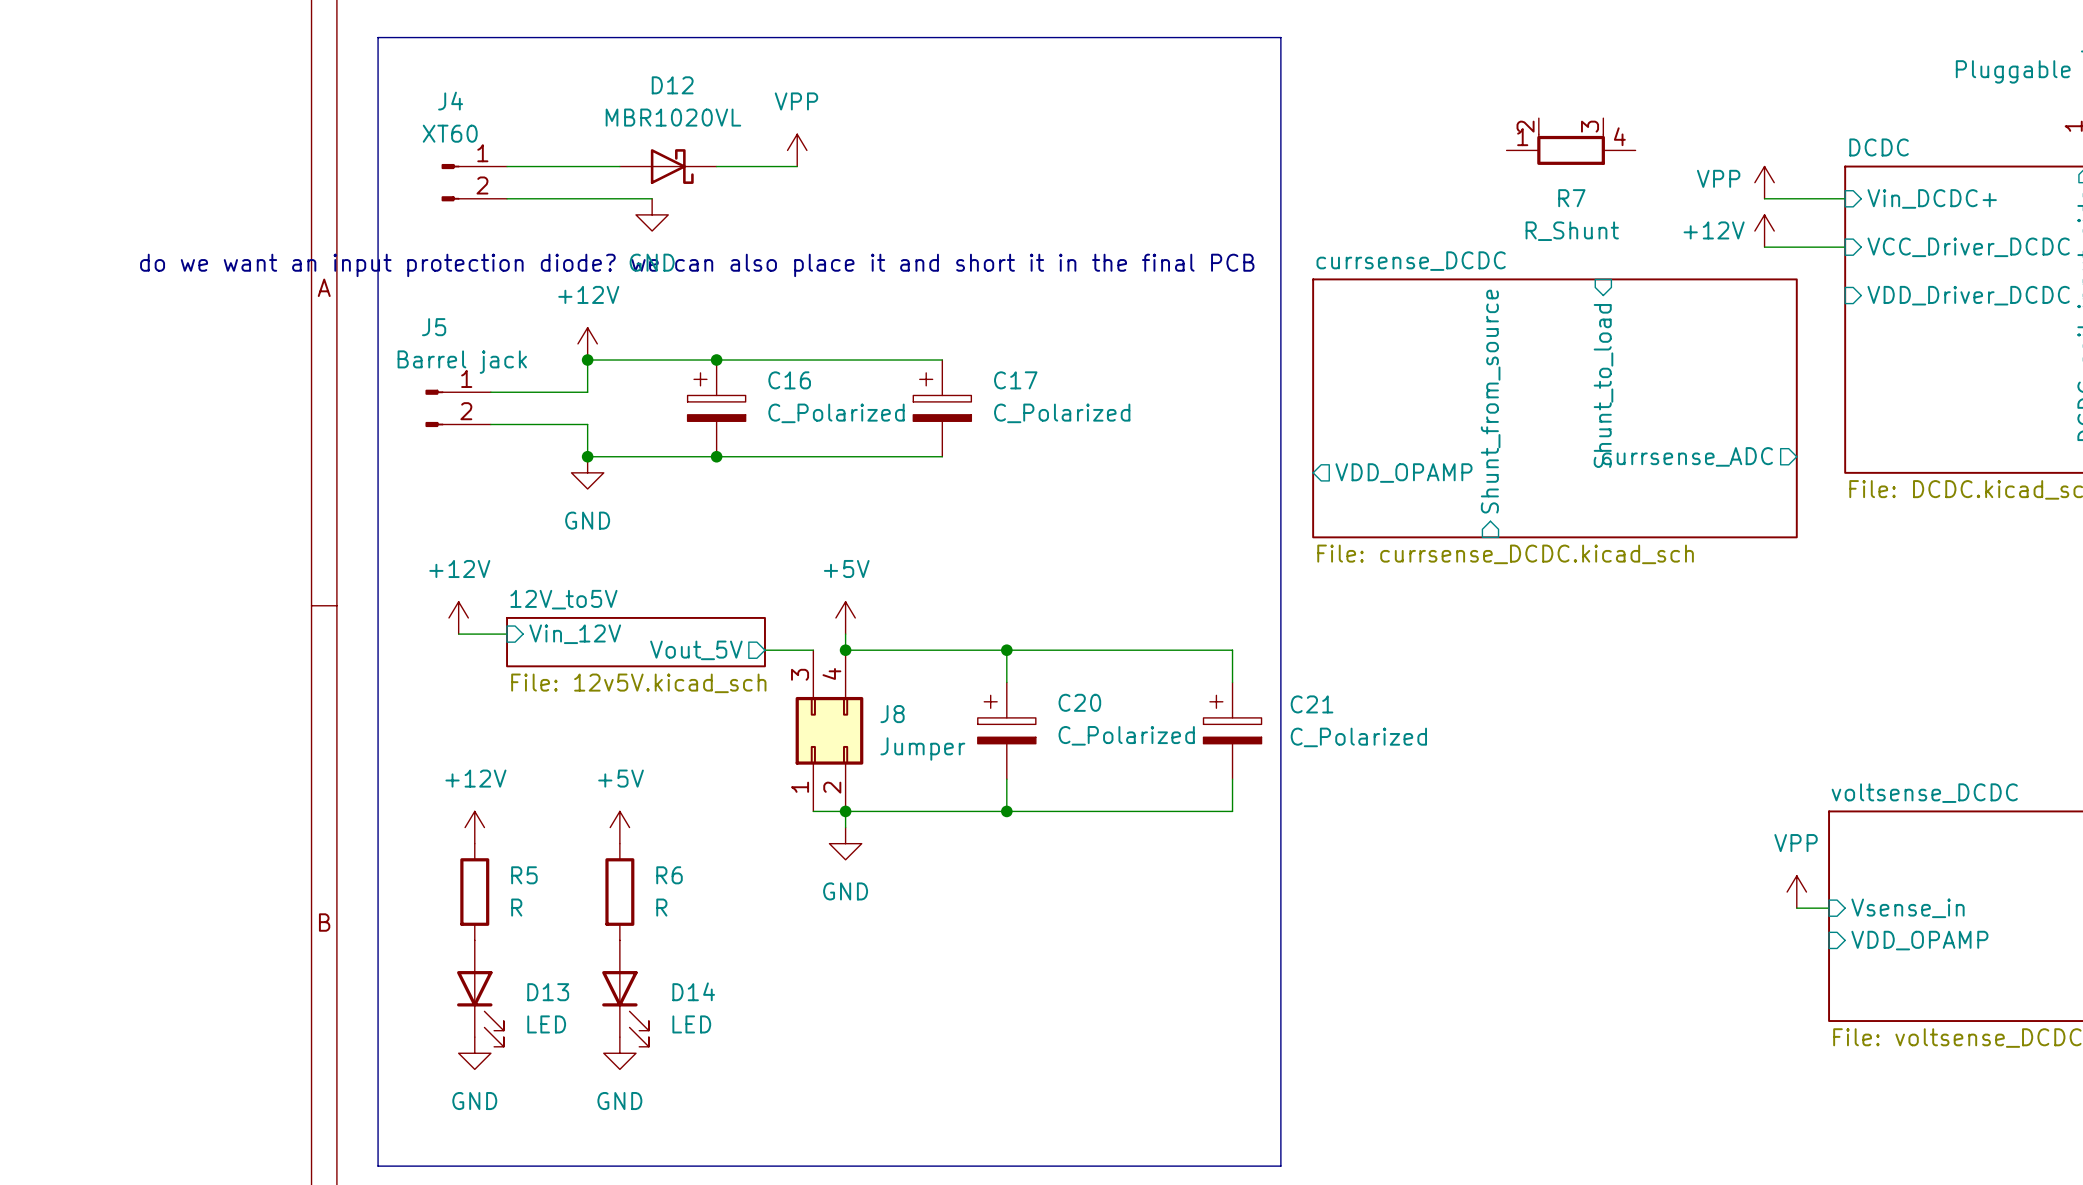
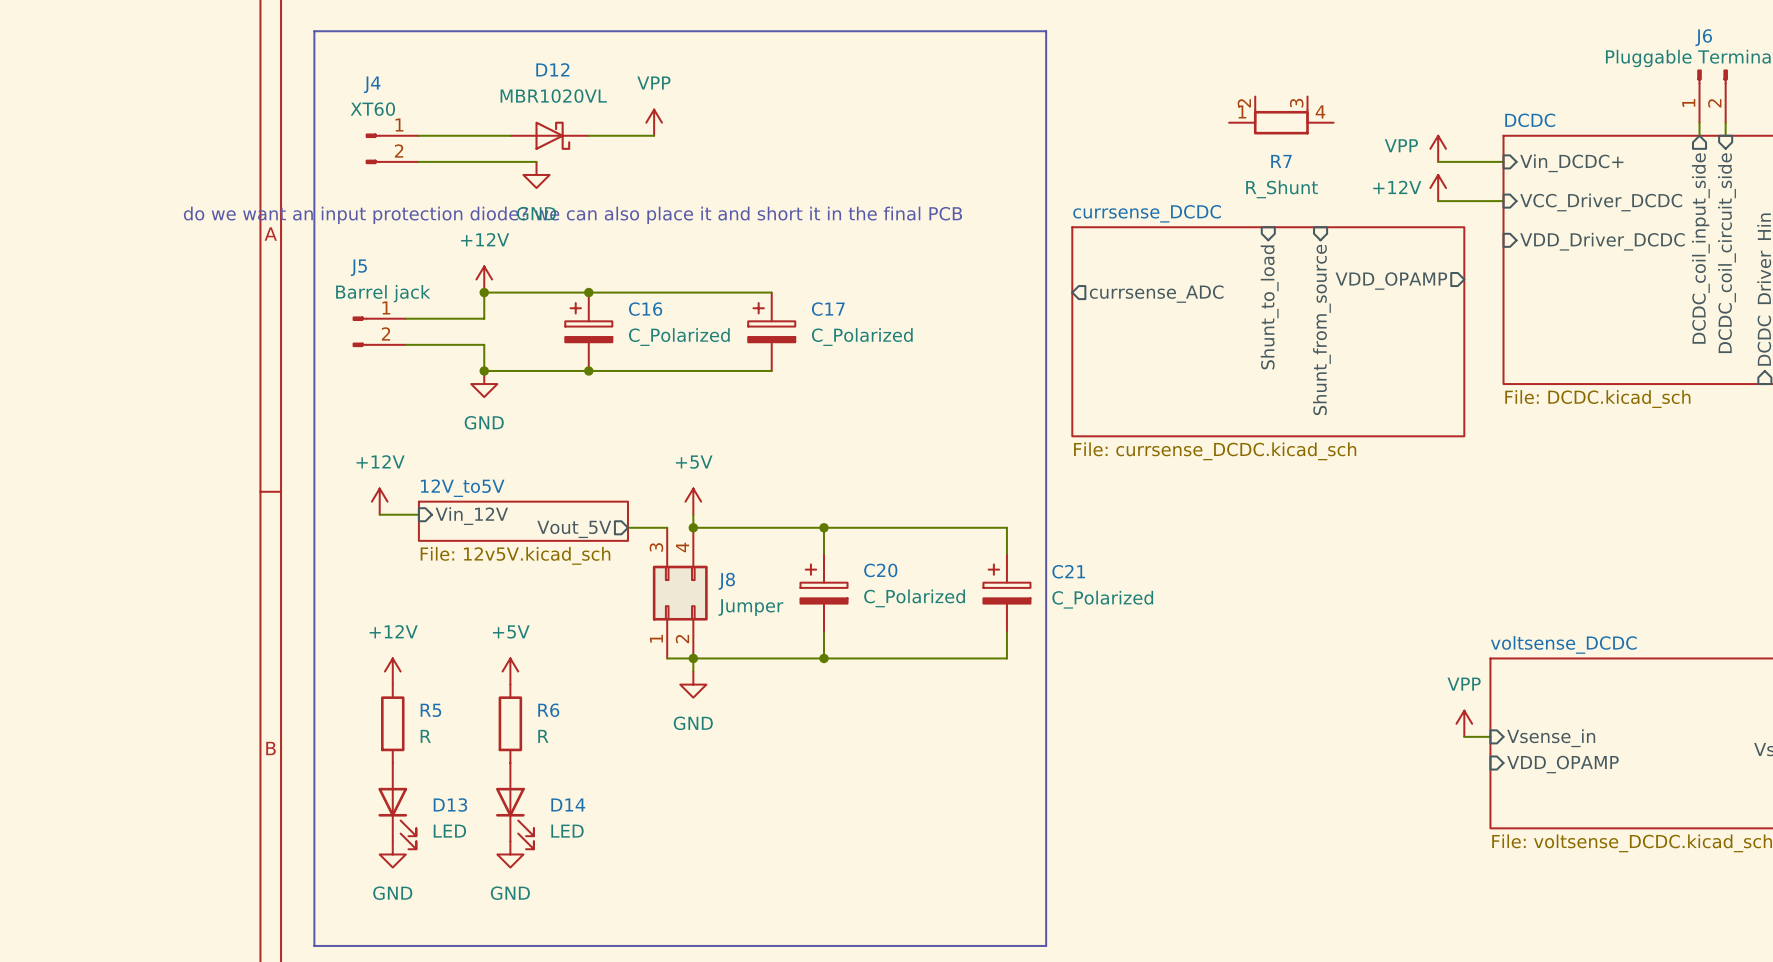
sheet pin: none -> VDD_OPAMP (1391, 281)
sheet pin: none -> currsense_ADC (1156, 294)
sheet pin position: Shunt_to_load (1603, 385) -> Shunt_to_load (1269, 307)
sheet pin rotation: 0° (1490, 401) -> 180° (1321, 329)
sheet pin: currsense_ADC (1687, 456) -> none
sheet pin: VDD_OPAMP (1403, 473) -> none

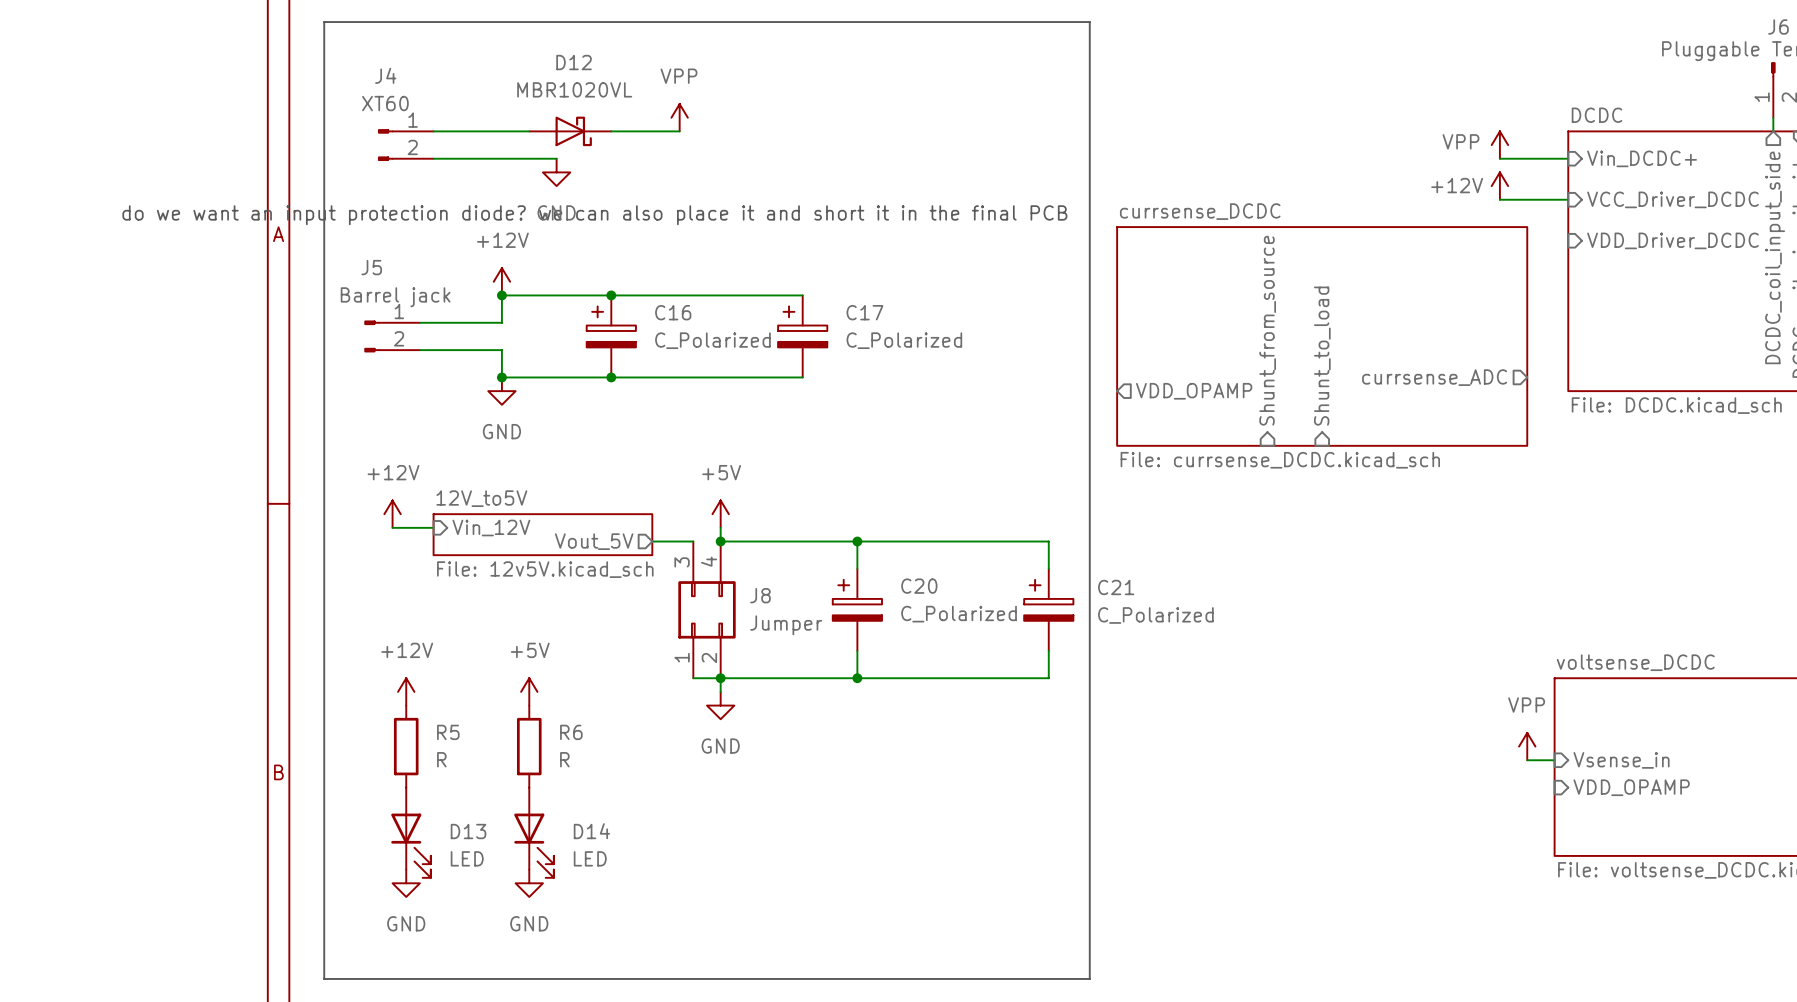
R7: R_Shunt (1281, 115) -> none
sheet pin: VDD_OPAMP (1391, 281) -> none
sheet pin: currsense_ADC (1156, 294) -> none
sheet pin rotation: 0° (1269, 307) -> 180° (1322, 356)
sheet pin rotation: 0° (1321, 329) -> 180° (1267, 330)
sheet pin: none -> currsense_ADC (1434, 377)
sheet pin: none -> VDD_OPAMP (1194, 391)

